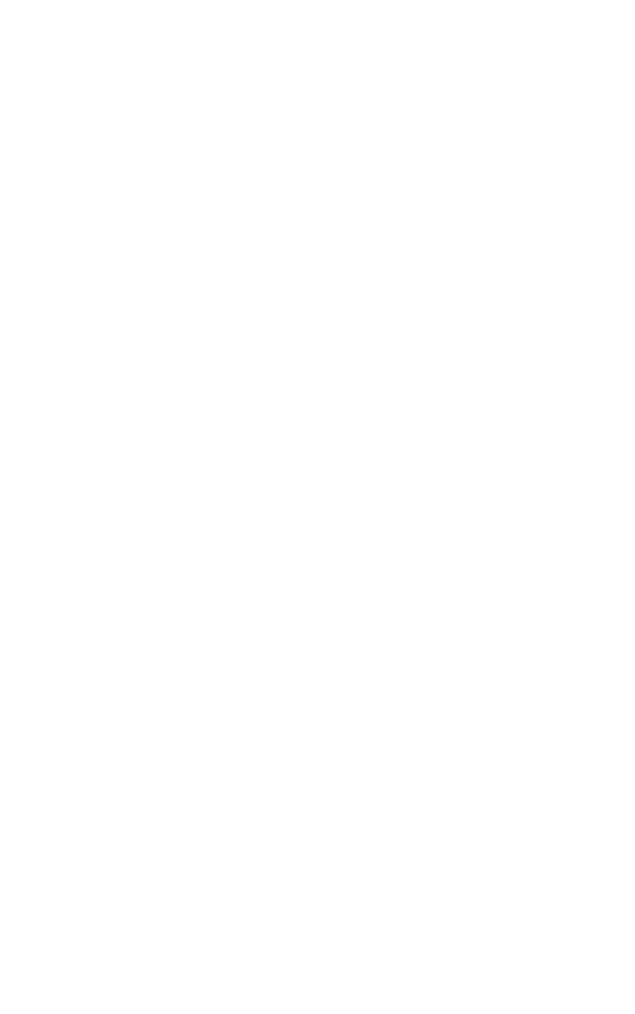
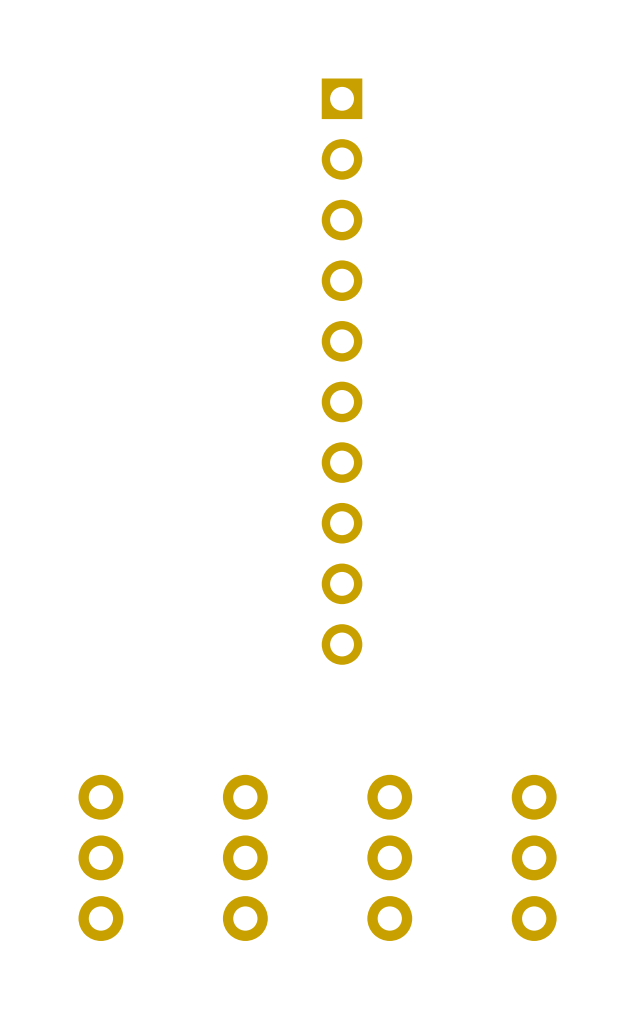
part: none -> (342, 371)
part: none -> (100, 857)
part: none -> (245, 857)
part: none -> (389, 857)
part: none -> (534, 857)

